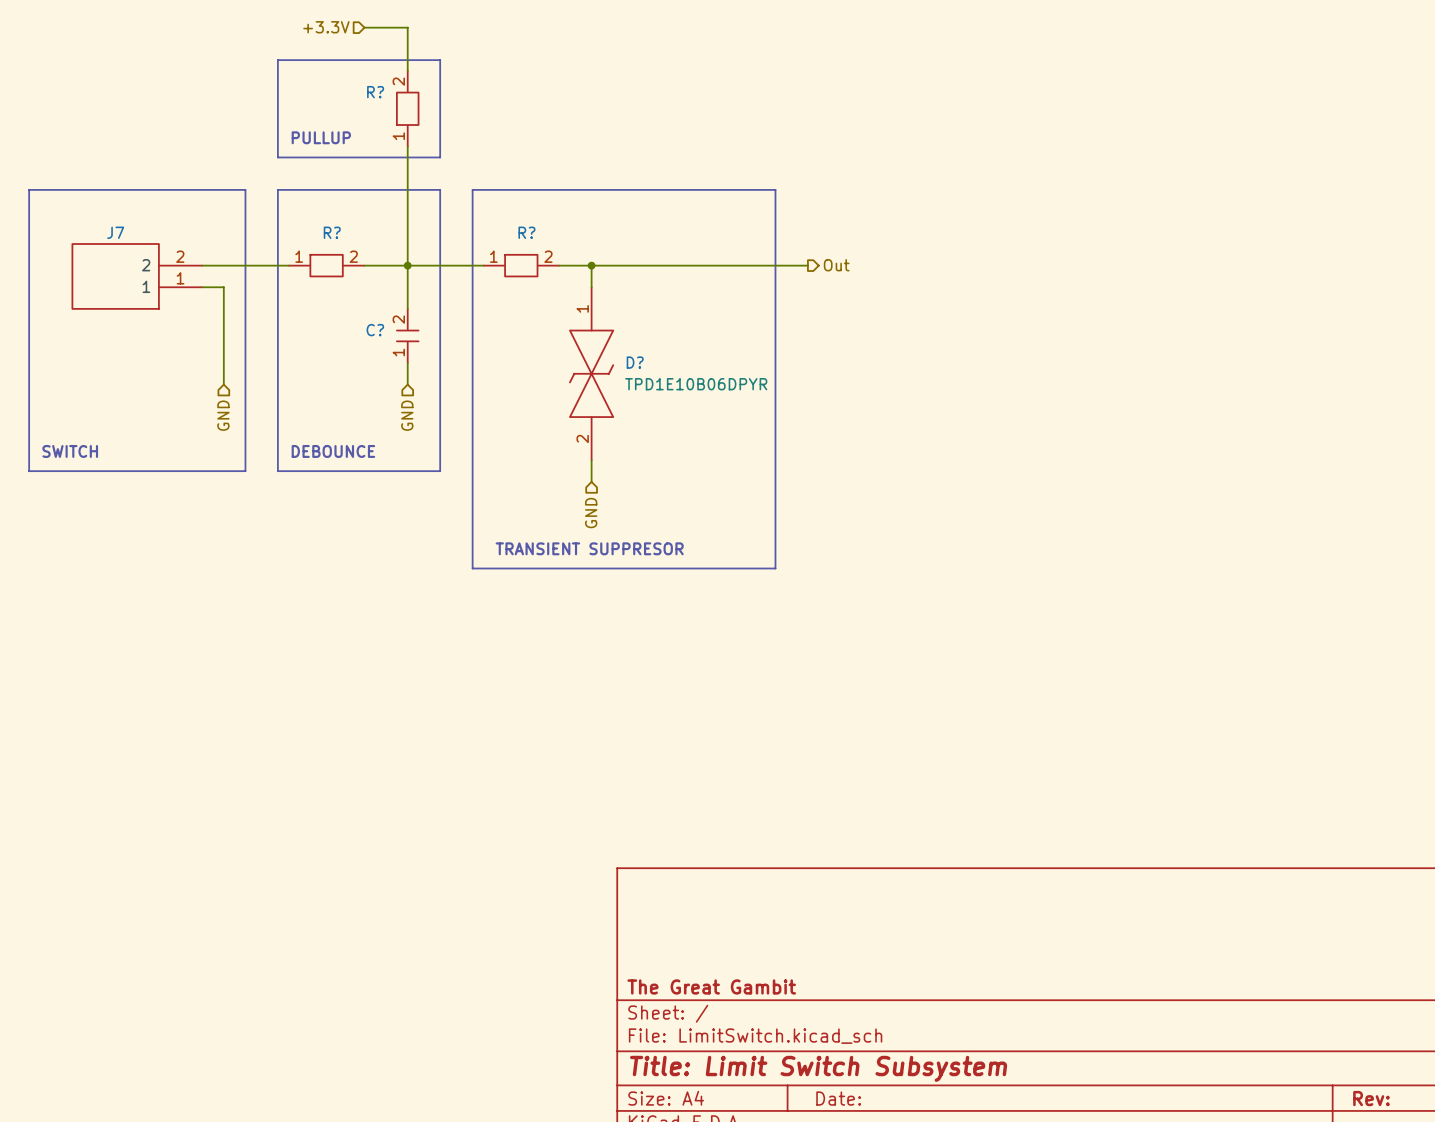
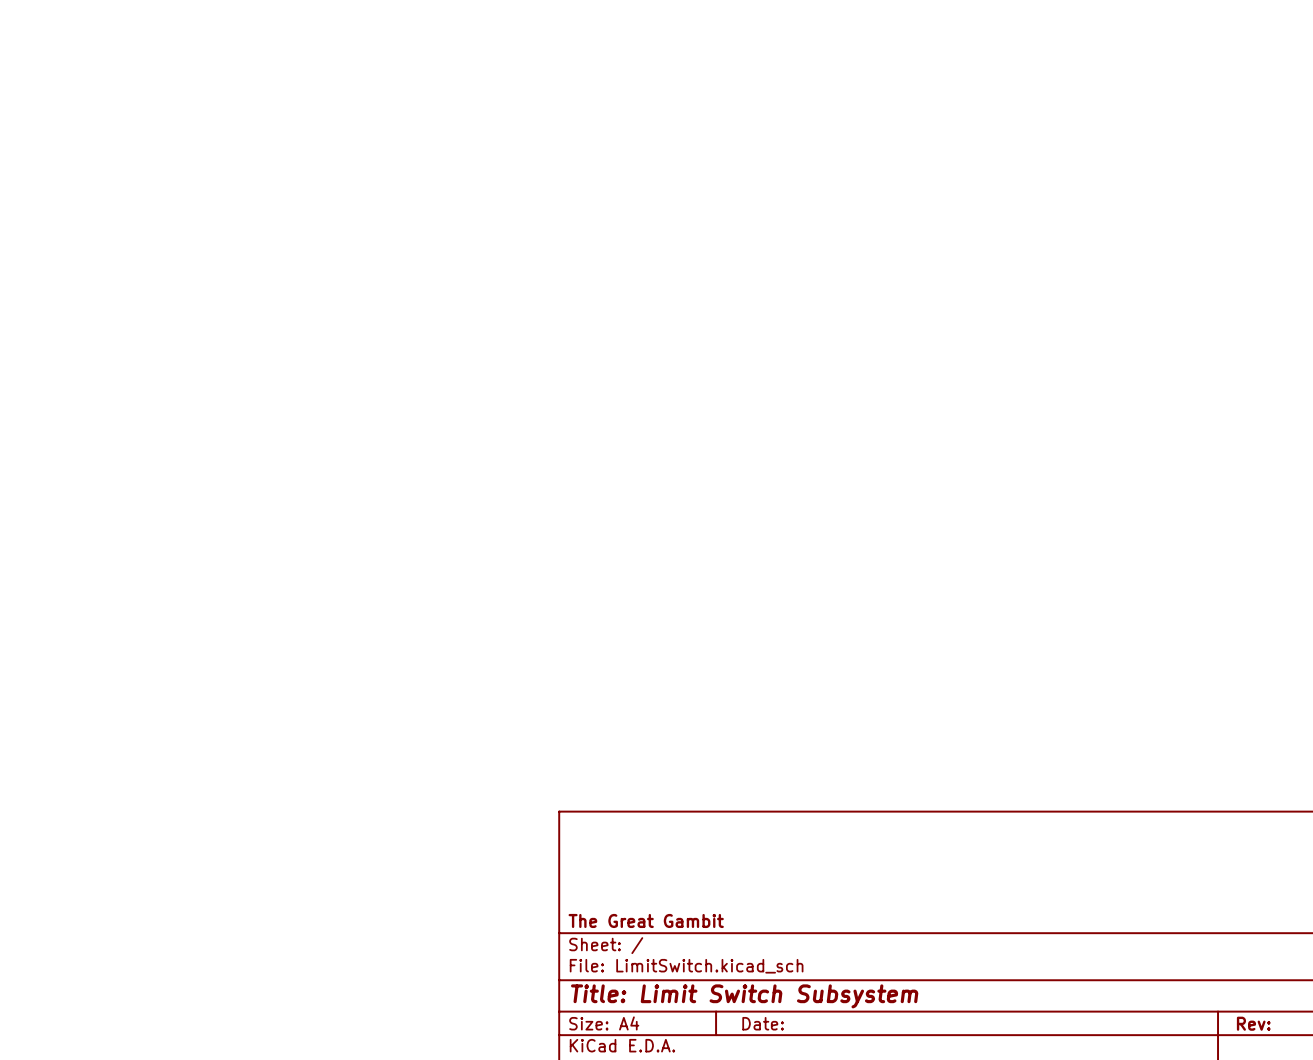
hierarchical label: +3.3V (326, 27) -> none
wire: (364, 27) (407, 27) (407, 70) -> none
line: (277, 60) (277, 157) (440, 157) (440, 60) (277, 60) -> none
R?: (407, 108) -> none
text: PULLUP (321, 137) -> none
wire: (407, 146) (407, 308) -> none
line: (29, 189) (245, 189) (245, 471) (29, 471) (29, 189) -> none
line: (277, 189) (440, 189) (440, 471) (277, 471) (277, 189) -> none
line: (472, 189) (775, 189) (775, 568) (472, 568) (472, 189) -> none
wire: (202, 265) (288, 265) -> none
R?: (326, 265) -> none
wire: (364, 265) (483, 265) -> none
junction: (407, 265) -> none
R?: (521, 265) -> none
wire: (559, 265) (807, 265) -> none
wire: (591, 265) (591, 287) -> none
junction: (591, 265) -> none
hierarchical label: Out (836, 265) -> none
J7: (136, 276) -> none
wire: (202, 287) (223, 287) (223, 384) -> none
C?: (407, 335) -> none
wire: (407, 362) (407, 384) -> none
D?: TPD1E10B06DPYR (591, 373) -> none
hierarchical label: GND (223, 415) -> none
hierarchical label: GND (407, 415) -> none
text: SWITCH (70, 451) -> none
text: DEBOUNCE (333, 451) -> none
wire: (591, 460) (591, 481) -> none
hierarchical label: GND (591, 513) -> none
text: TRANSIENT SUPPRESOR (589, 548) -> none

